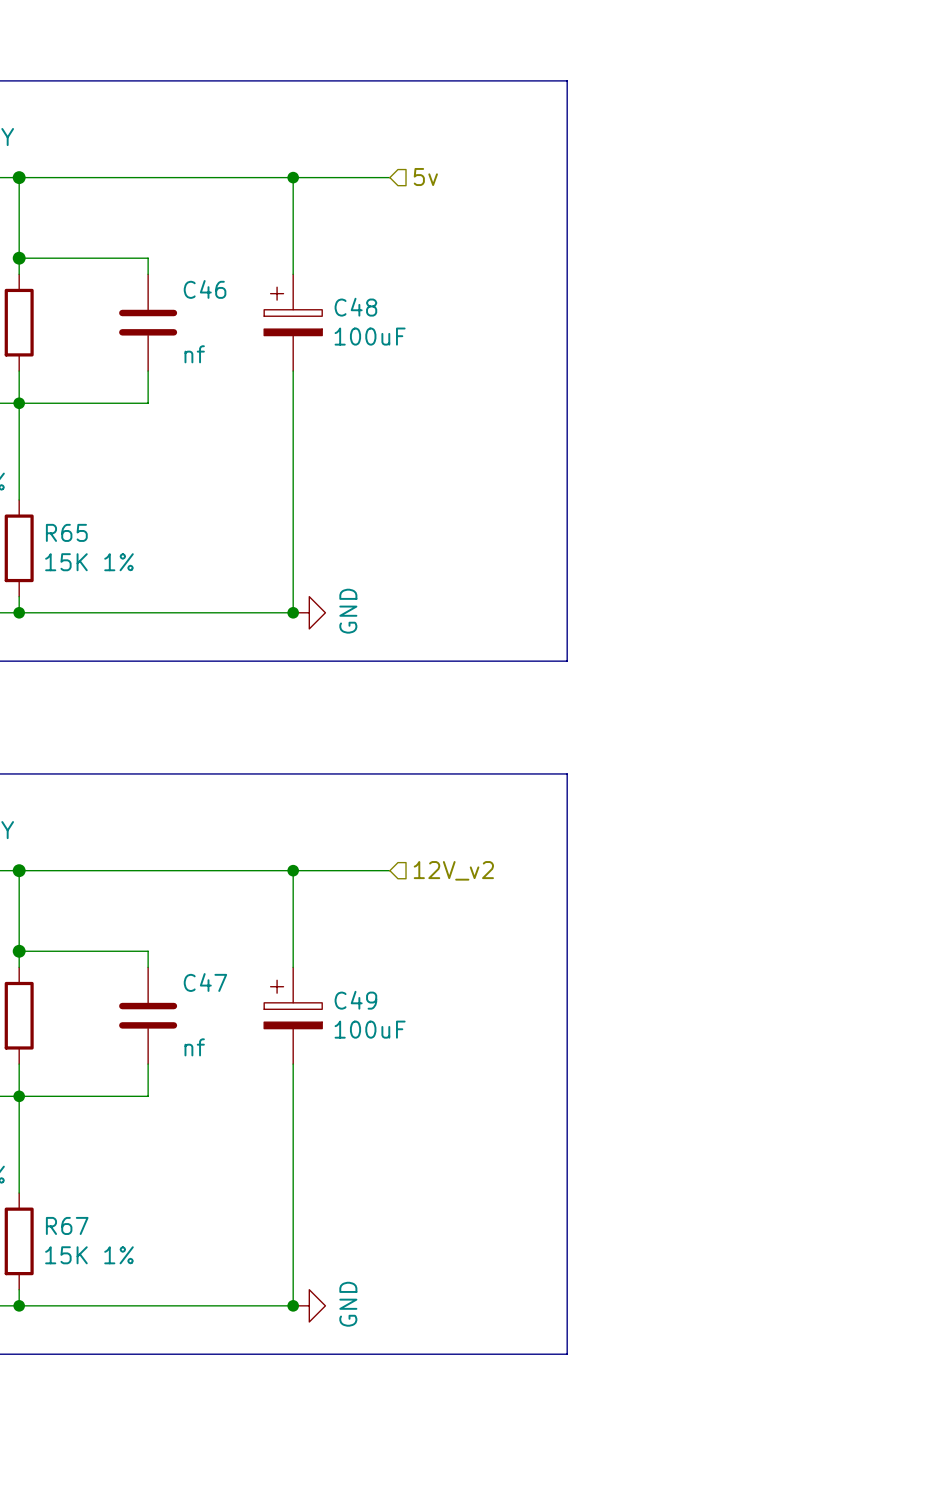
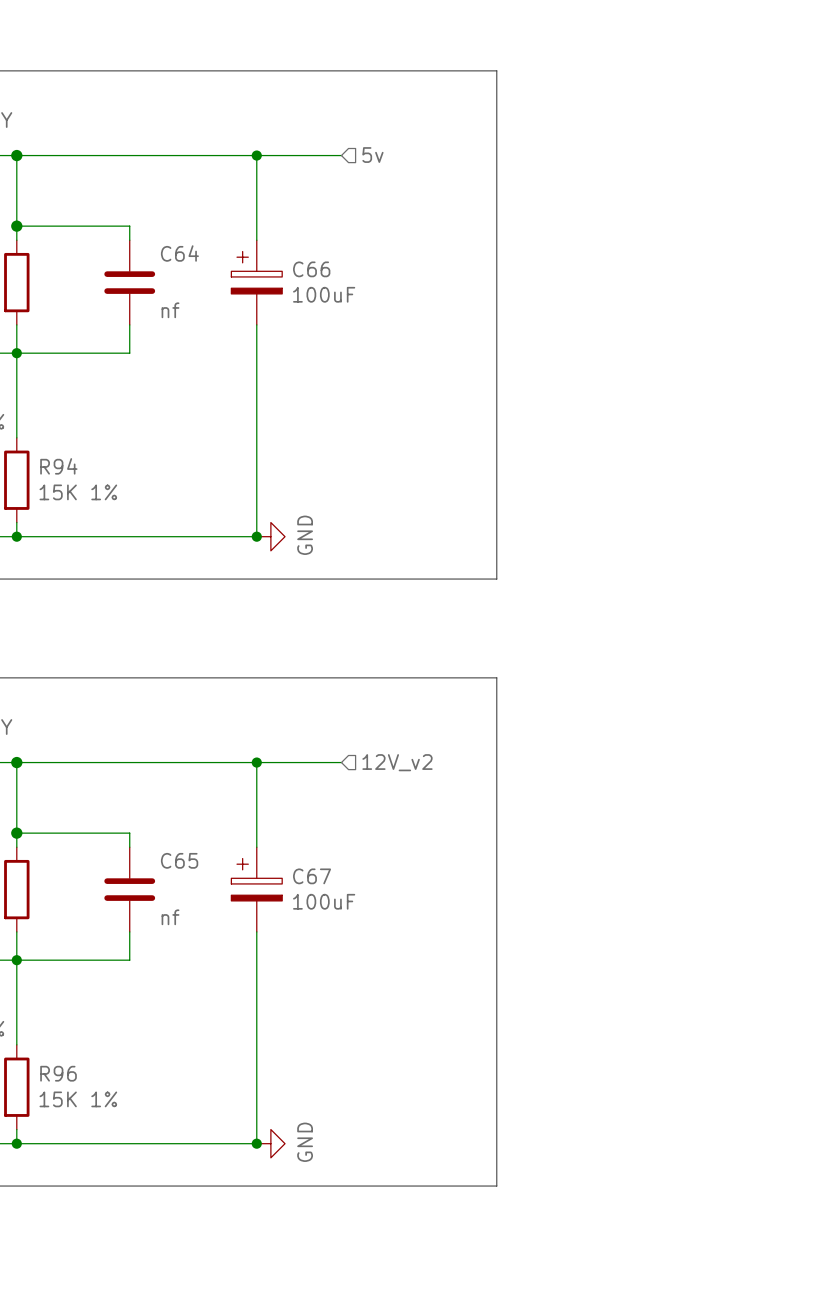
C46 name: C46 (205, 289) -> C64 (179, 253)
C48 name: C48 (355, 307) -> C66 (311, 269)
R65 name: R65 (66, 532) -> R94 (58, 466)
C47 name: C47 (205, 982) -> C65 (179, 860)
C49 name: C49 (355, 1000) -> C67 (312, 876)
R67 name: R67 (67, 1225) -> R96 (58, 1073)

